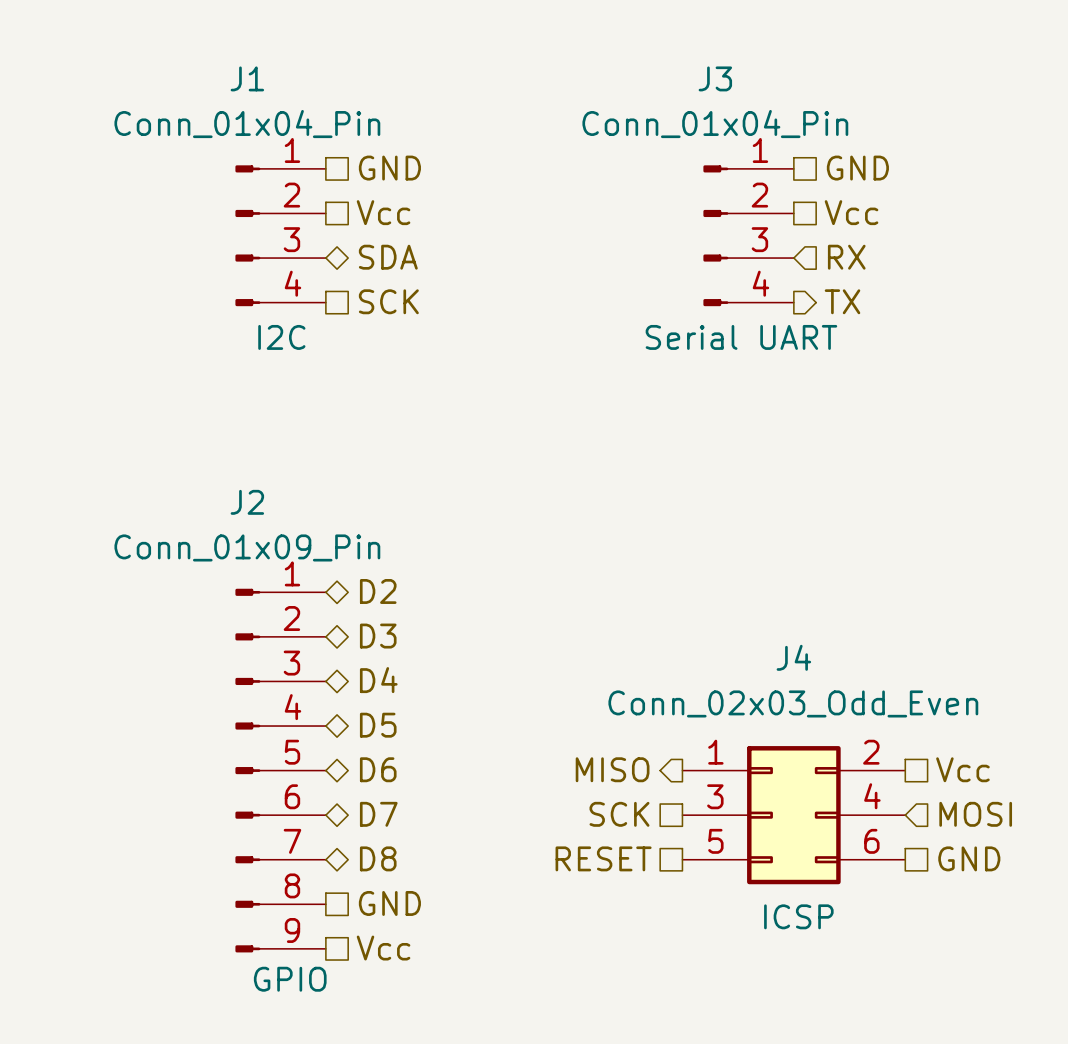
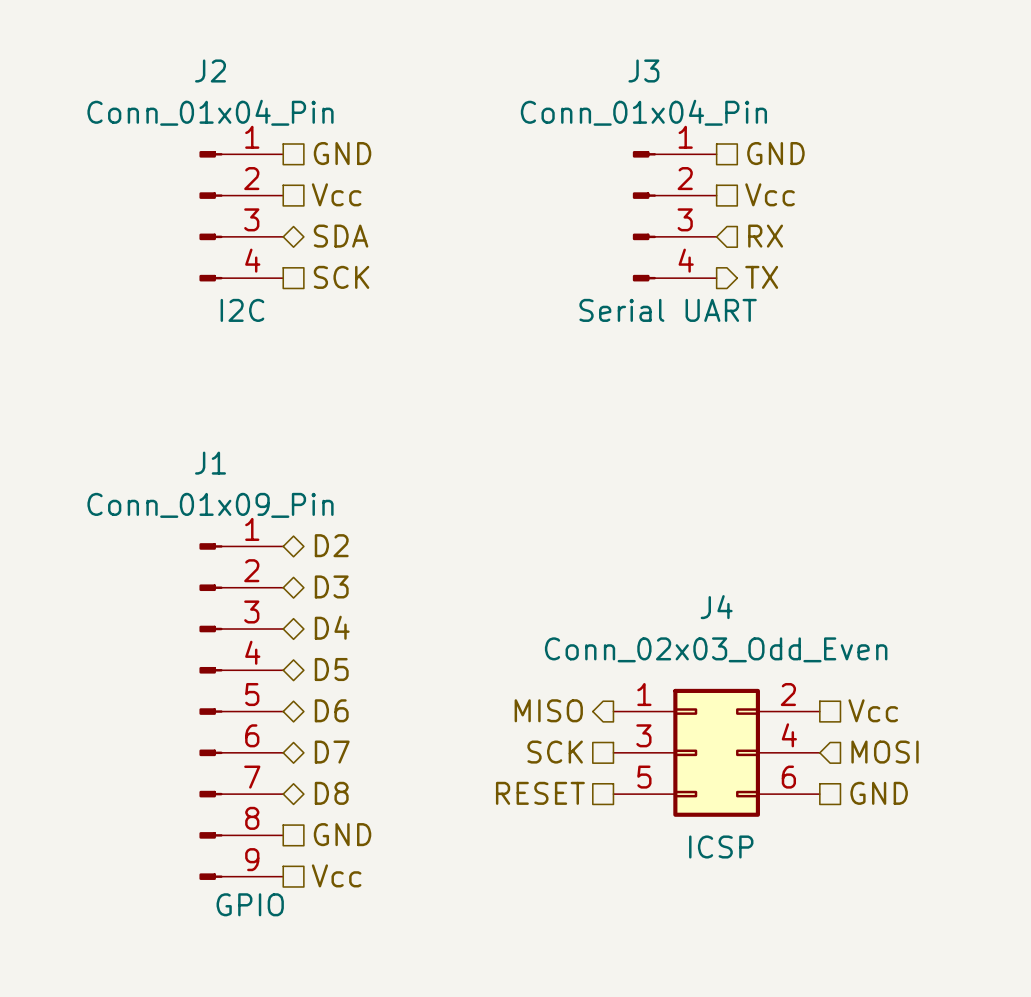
J1 name: J1 (247, 78) -> J2 (210, 70)
J2 name: J2 (247, 502) -> J1 (210, 463)

